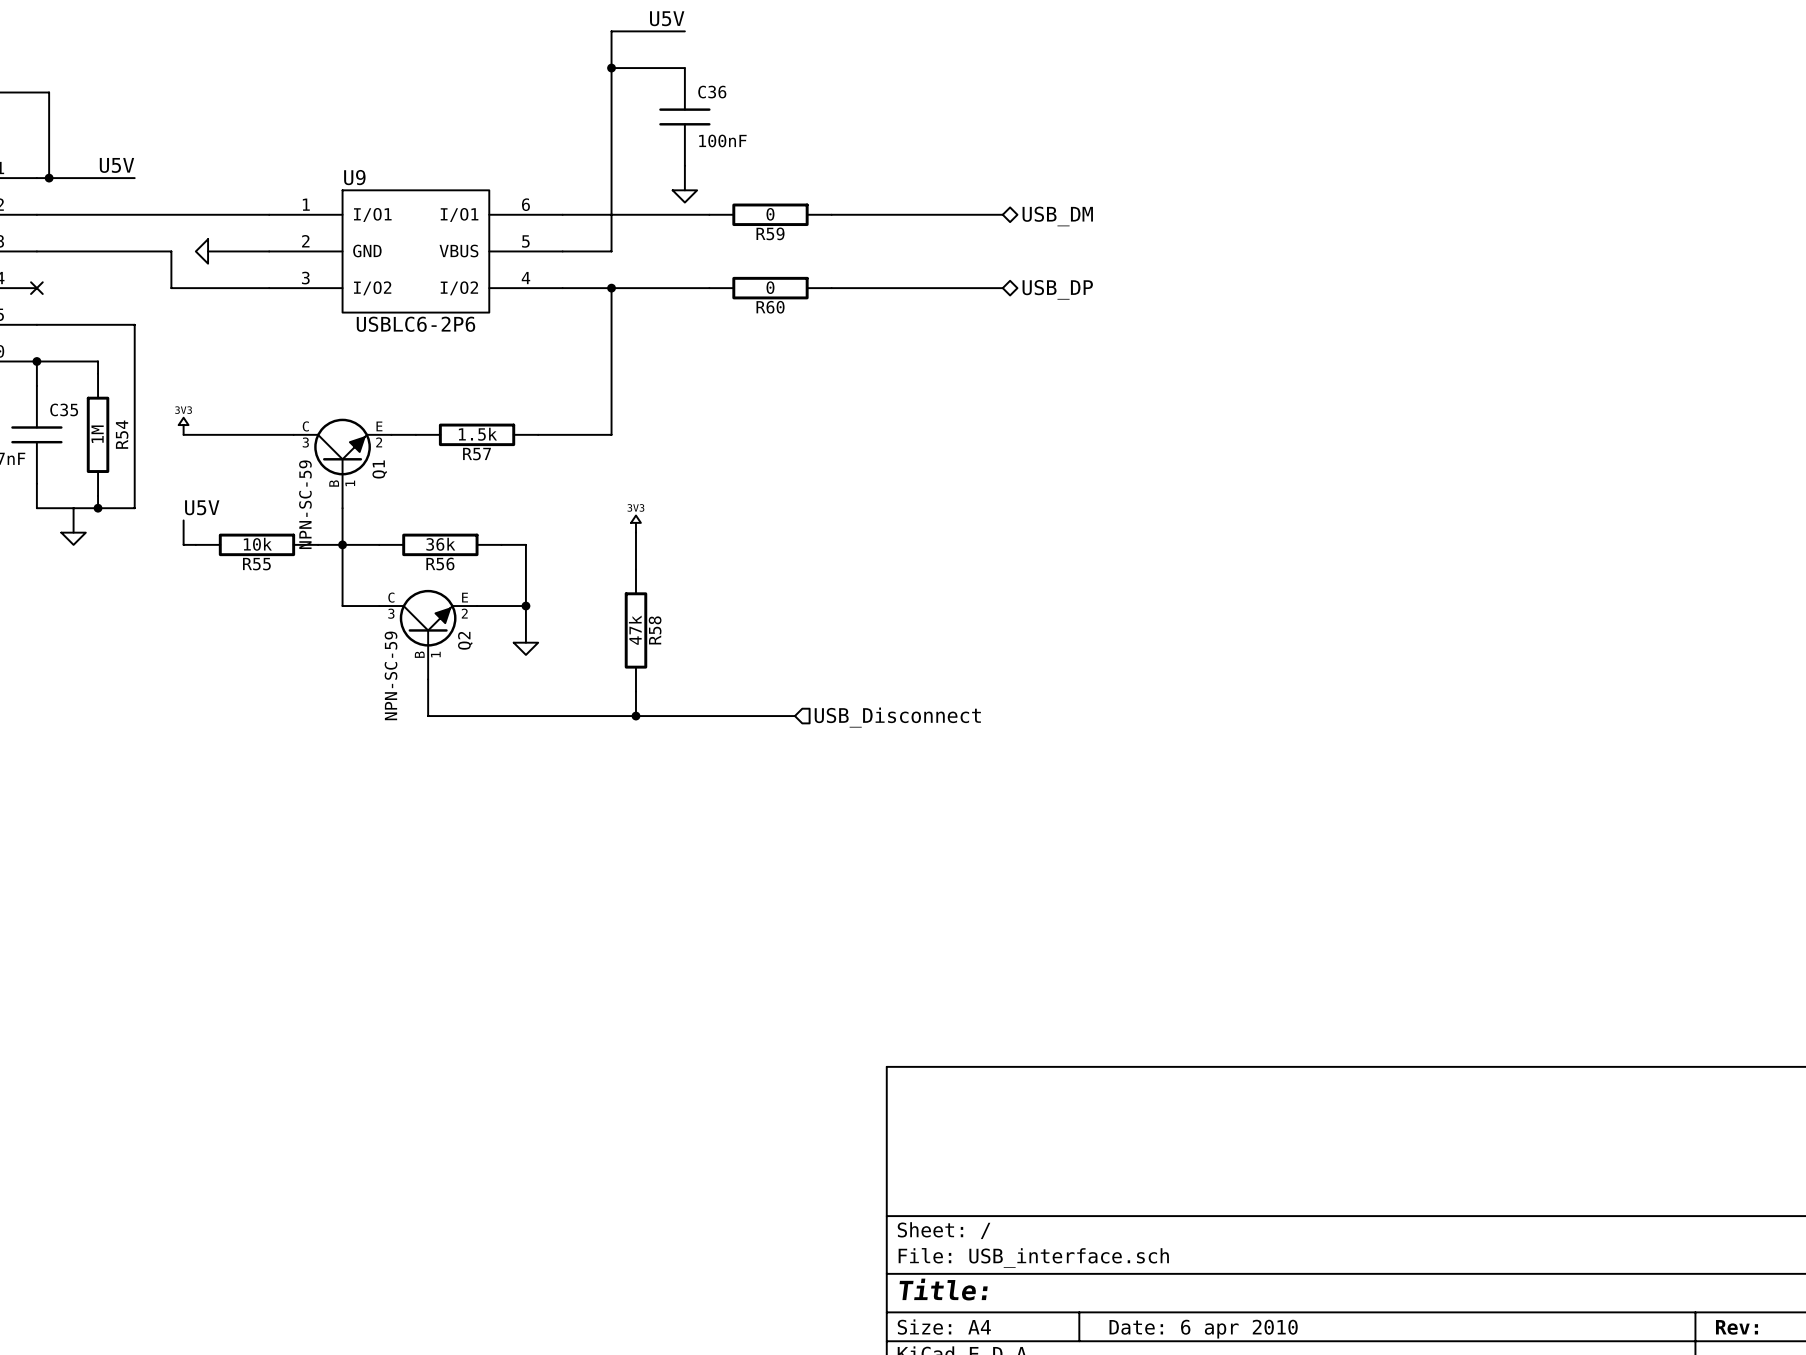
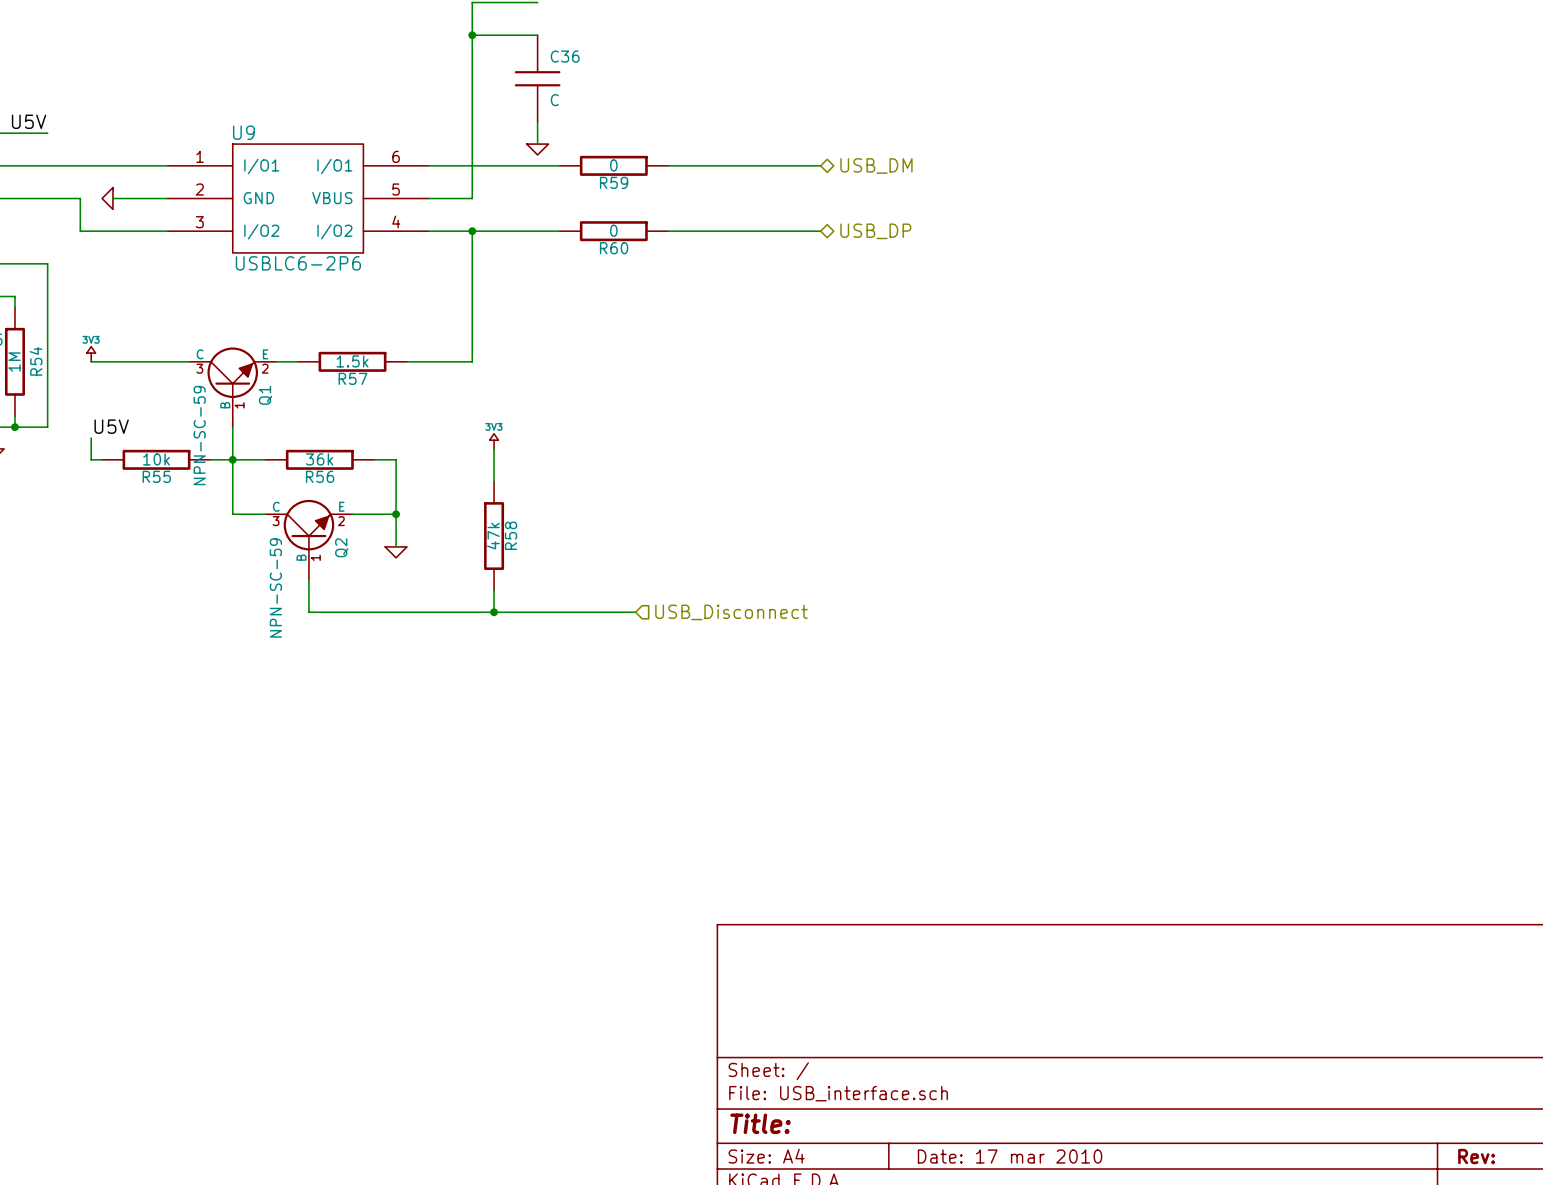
C36 value: 100nF (722, 140) -> C (554, 100)
title block: Date: 6 apr 2010 (1203, 1329) -> Date: 17 mar 2010 (1010, 1156)

